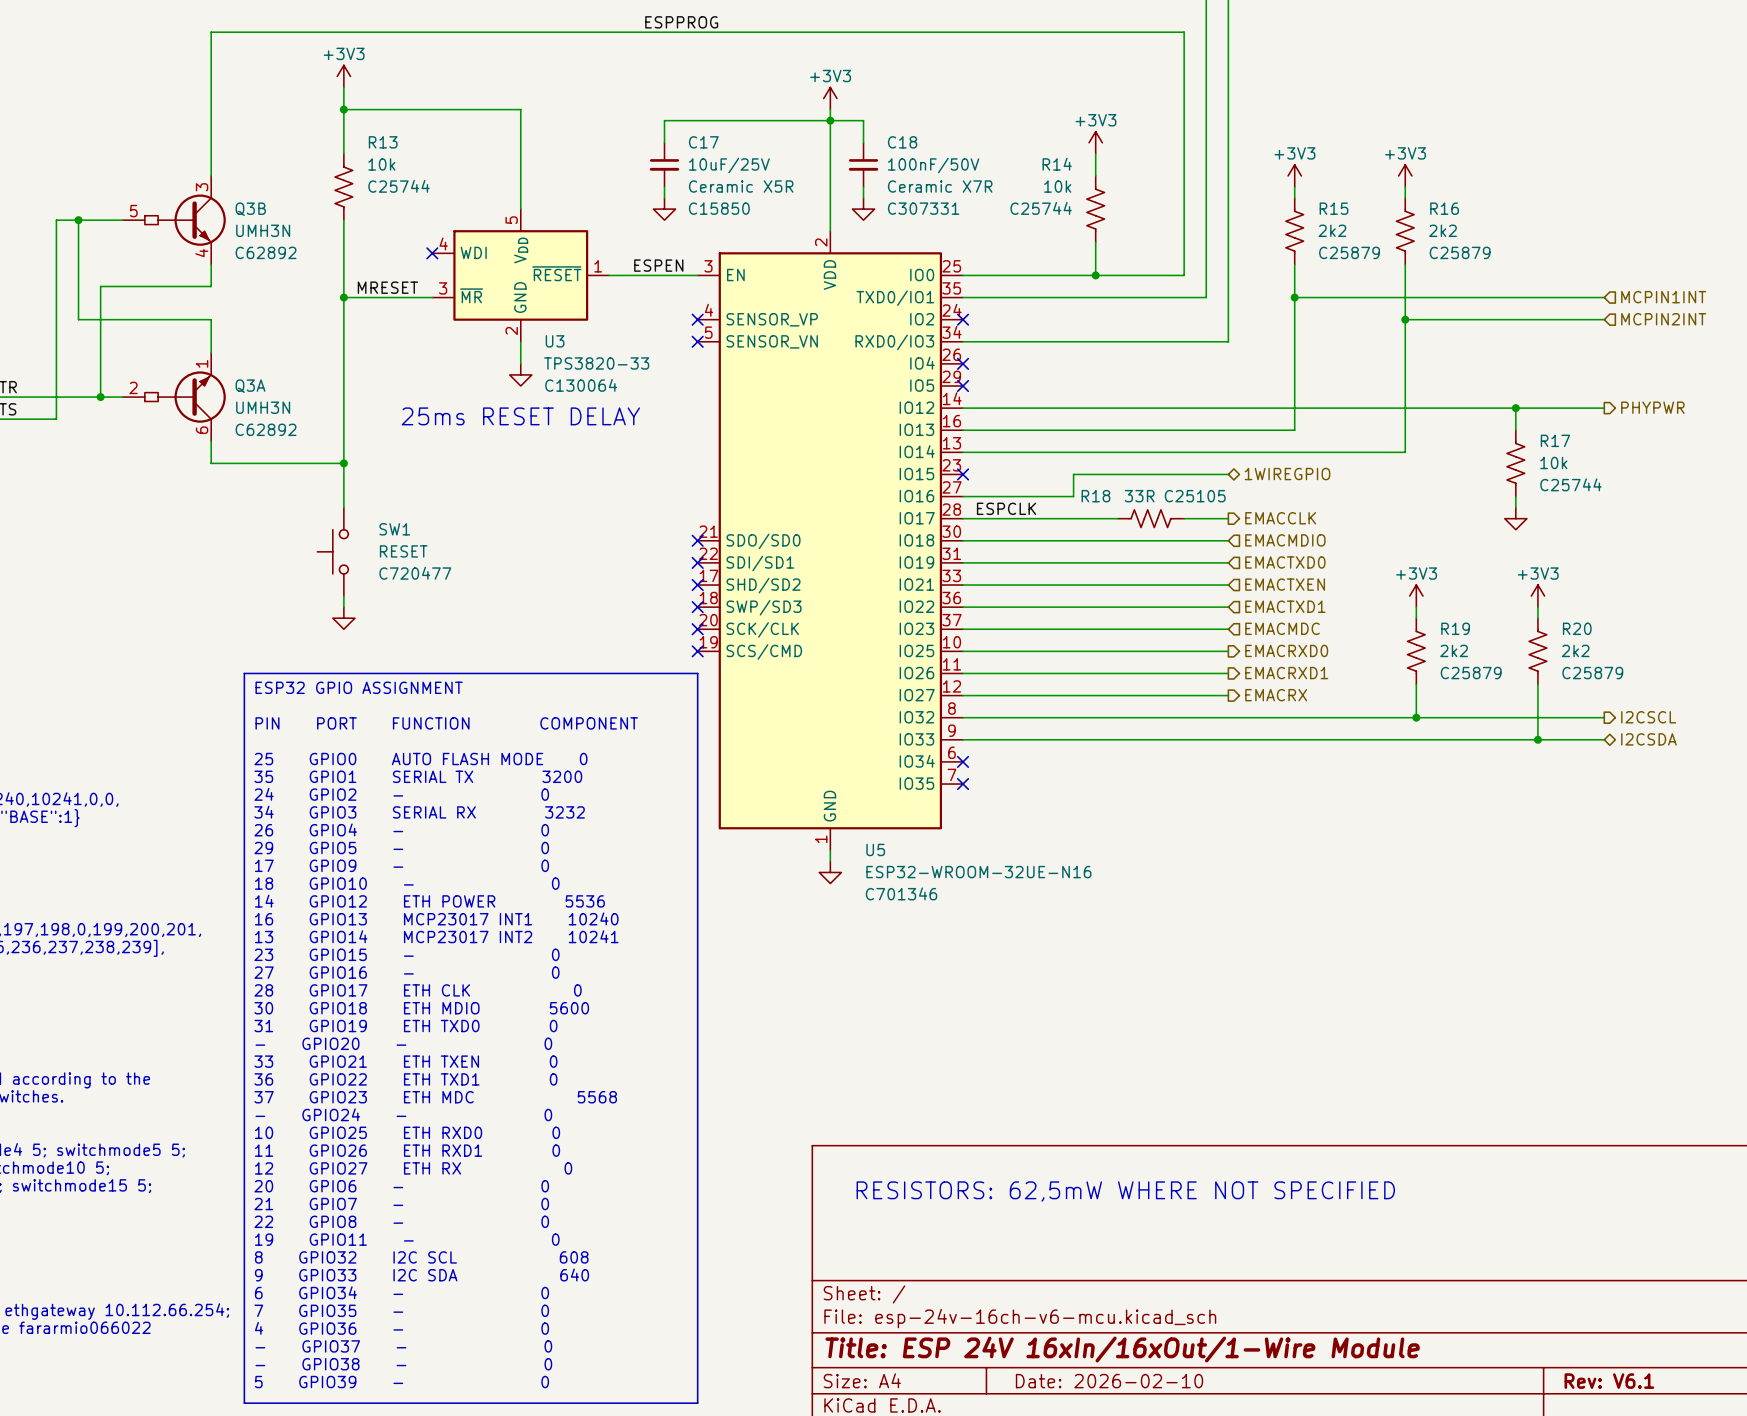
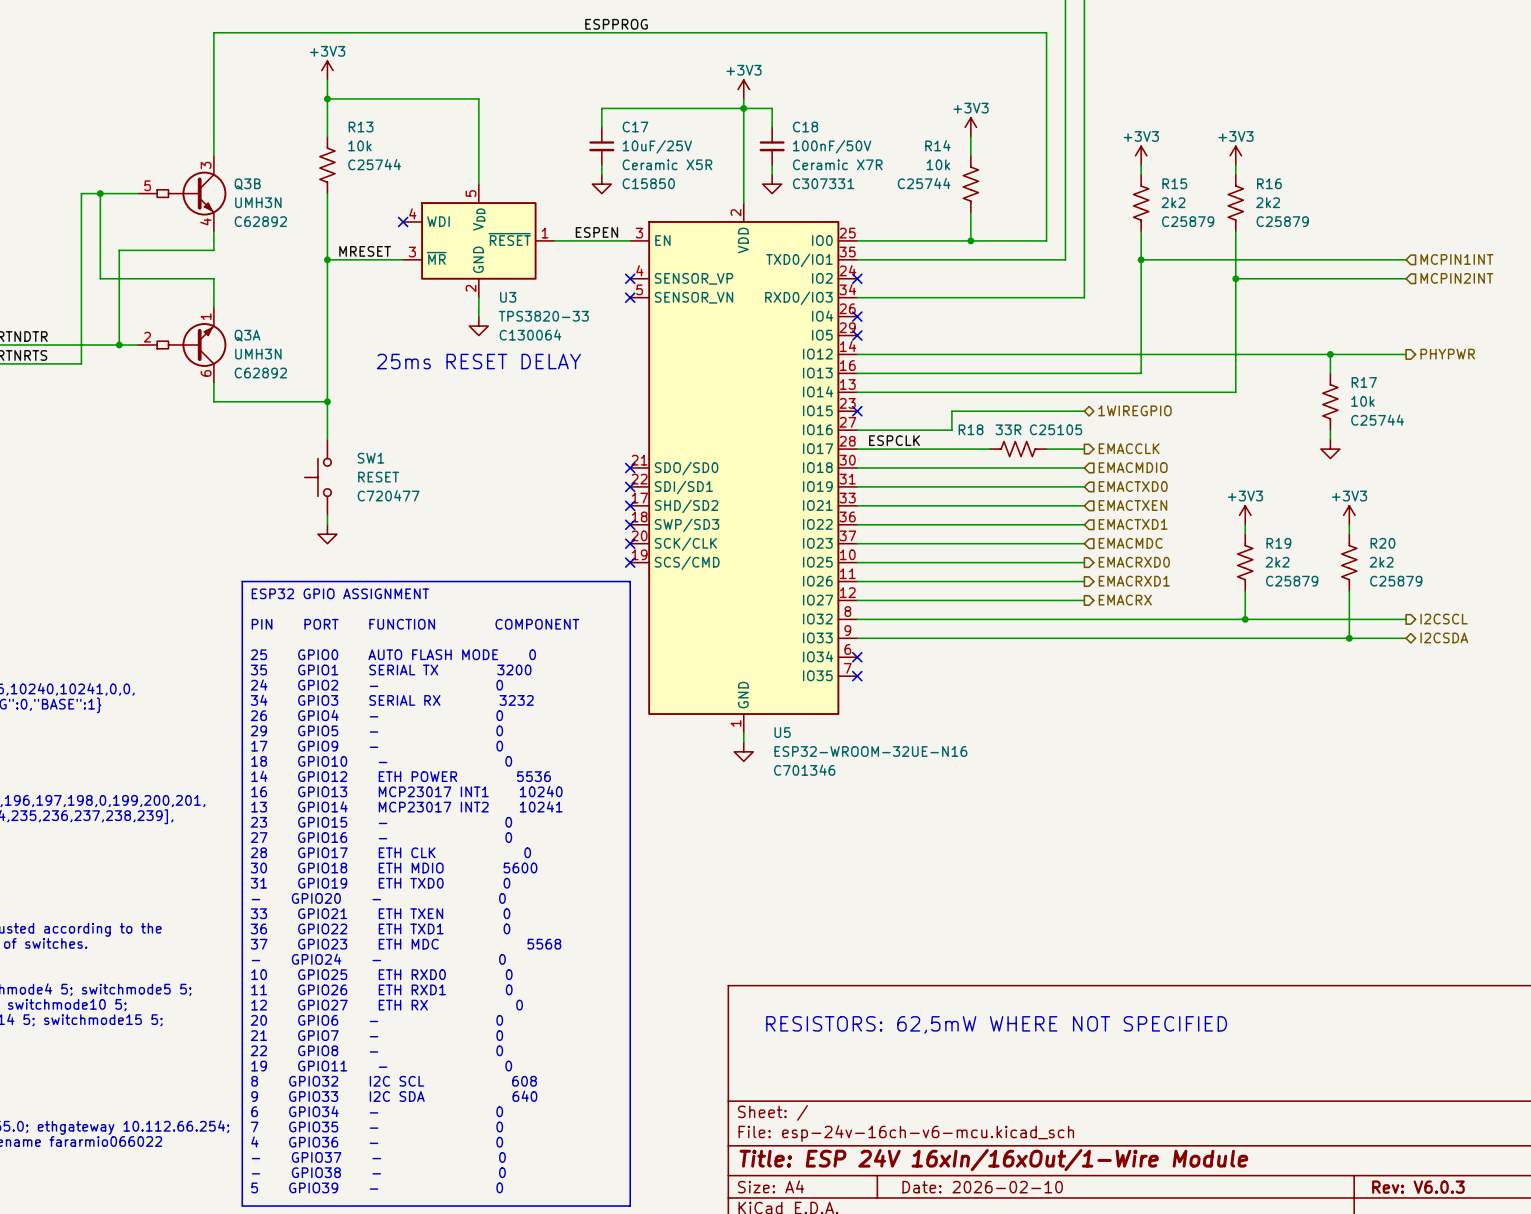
title block: Rev: V6.1 (1609, 1381) -> Rev: V6.0.3 (1418, 1187)

